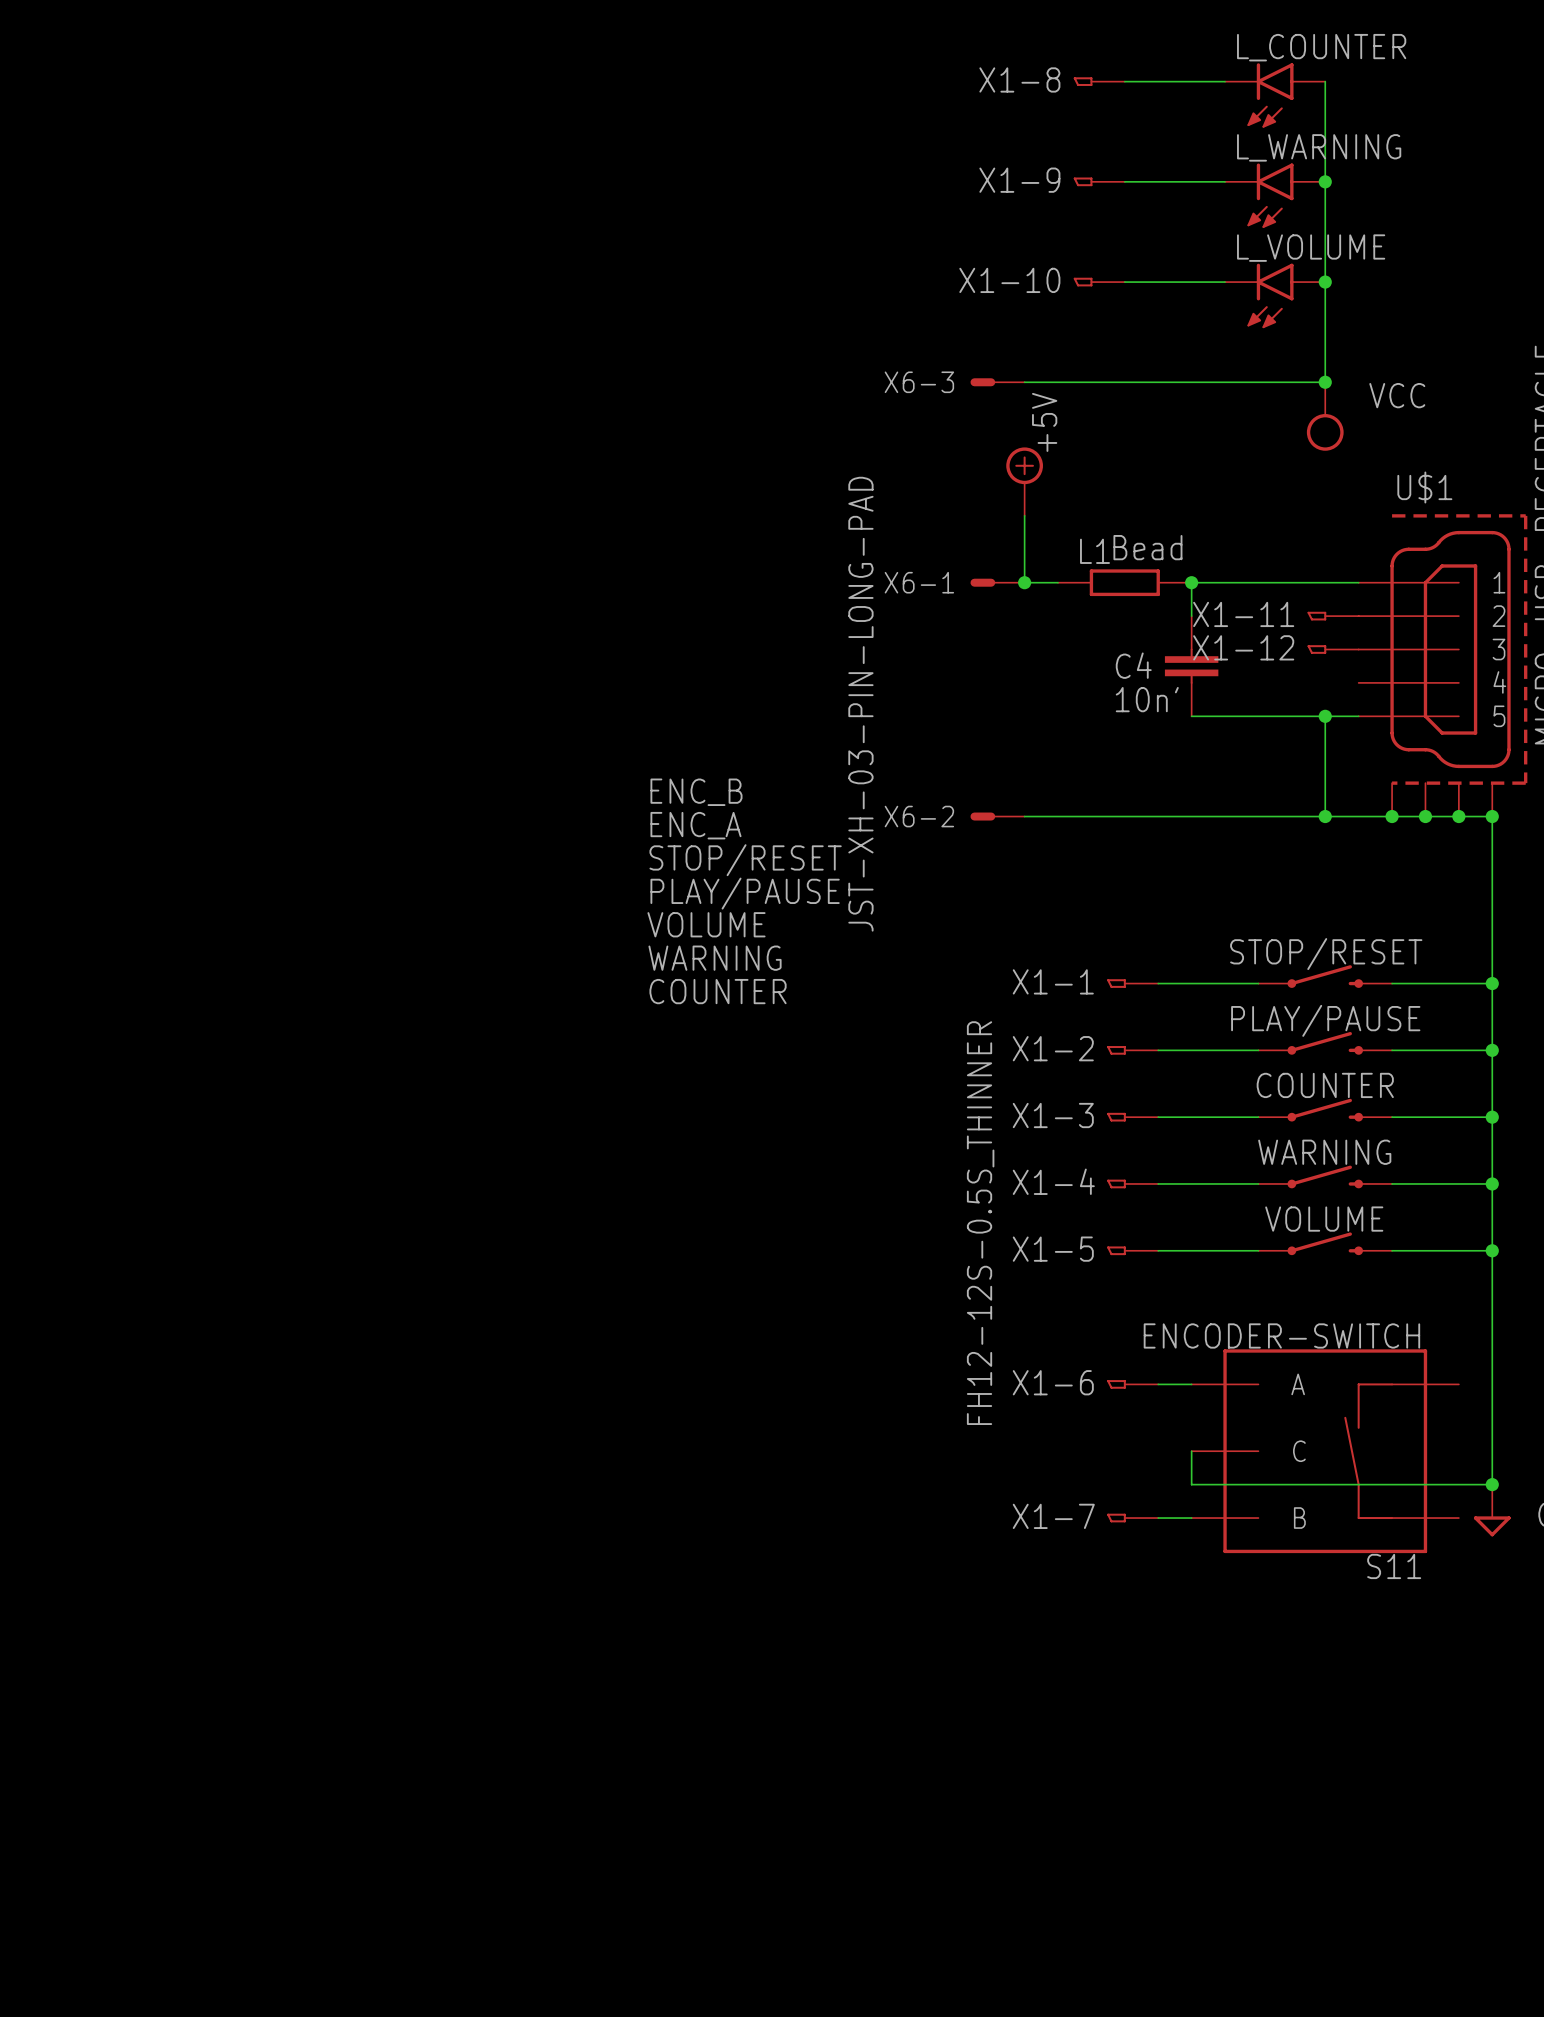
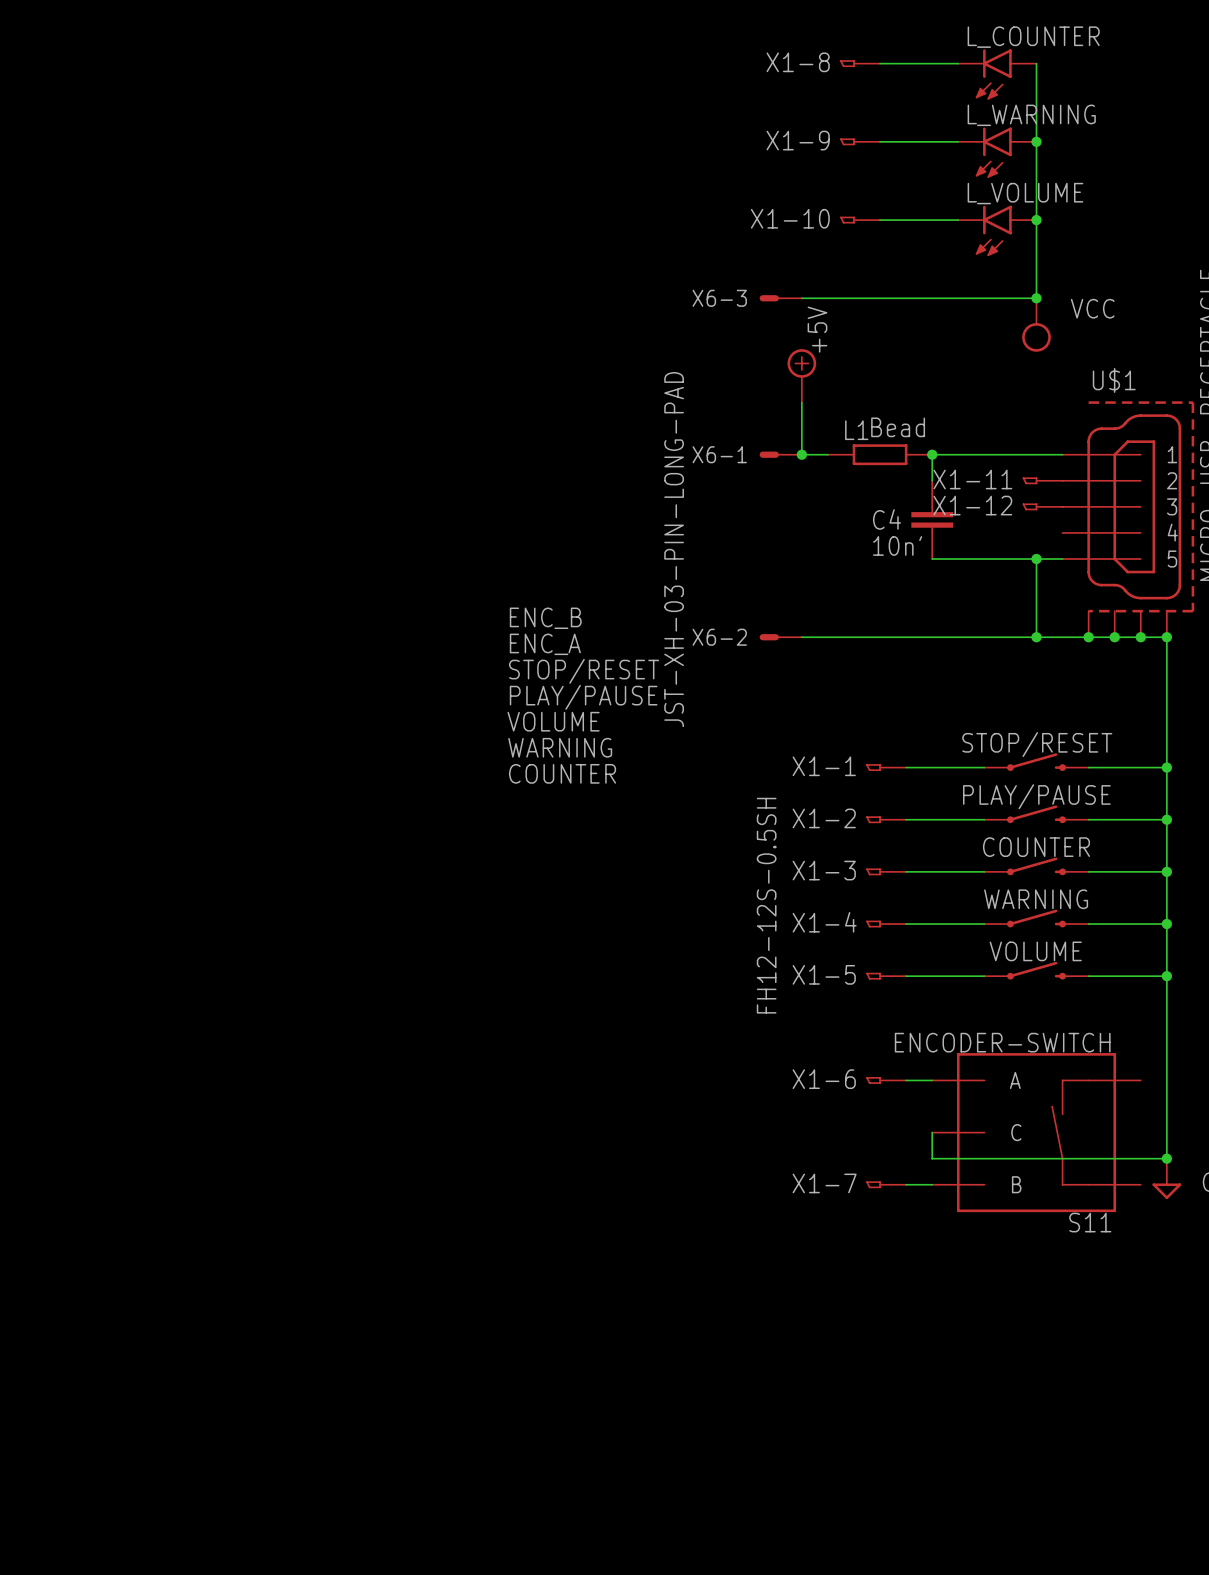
X1-1 value: FH12-12S-0.5S_THINNER (980, 1223) -> FH12-12S-0.5SH (766, 905)

